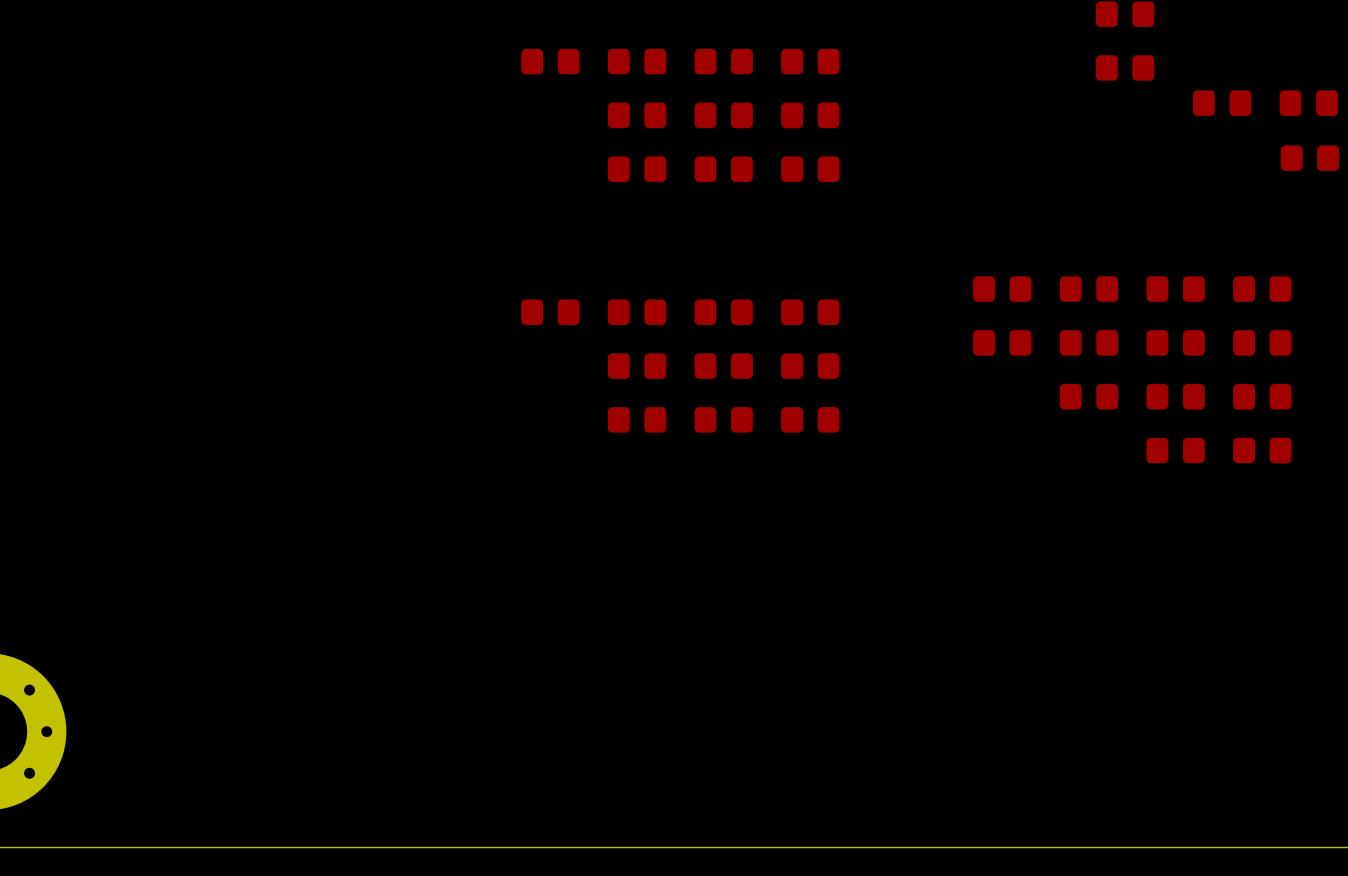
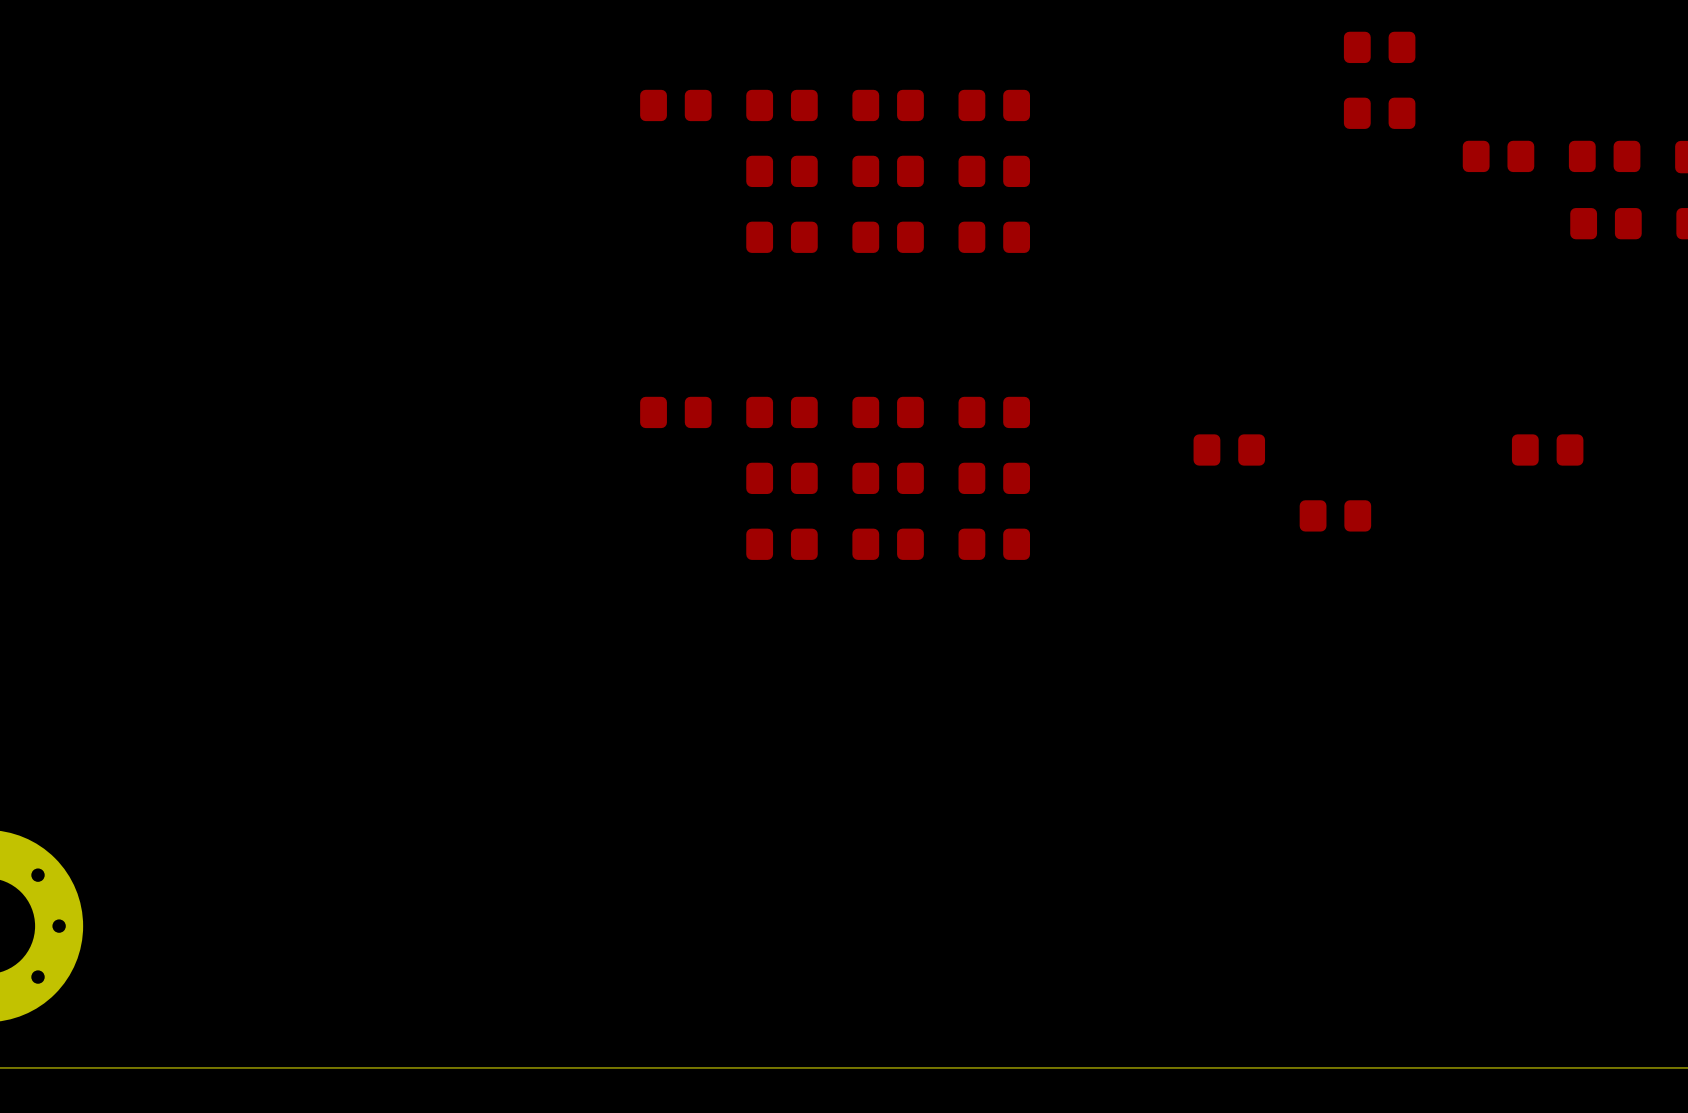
part: (1002, 289) -> none
part: (1088, 289) -> none
part: (1175, 289) -> none
part: (1262, 289) -> none
part: (1088, 342) -> none
part: (1175, 342) -> none
part: (1175, 396) -> none
part: (1262, 396) -> none
part: (1175, 450) -> none
part: (1262, 450) -> none

